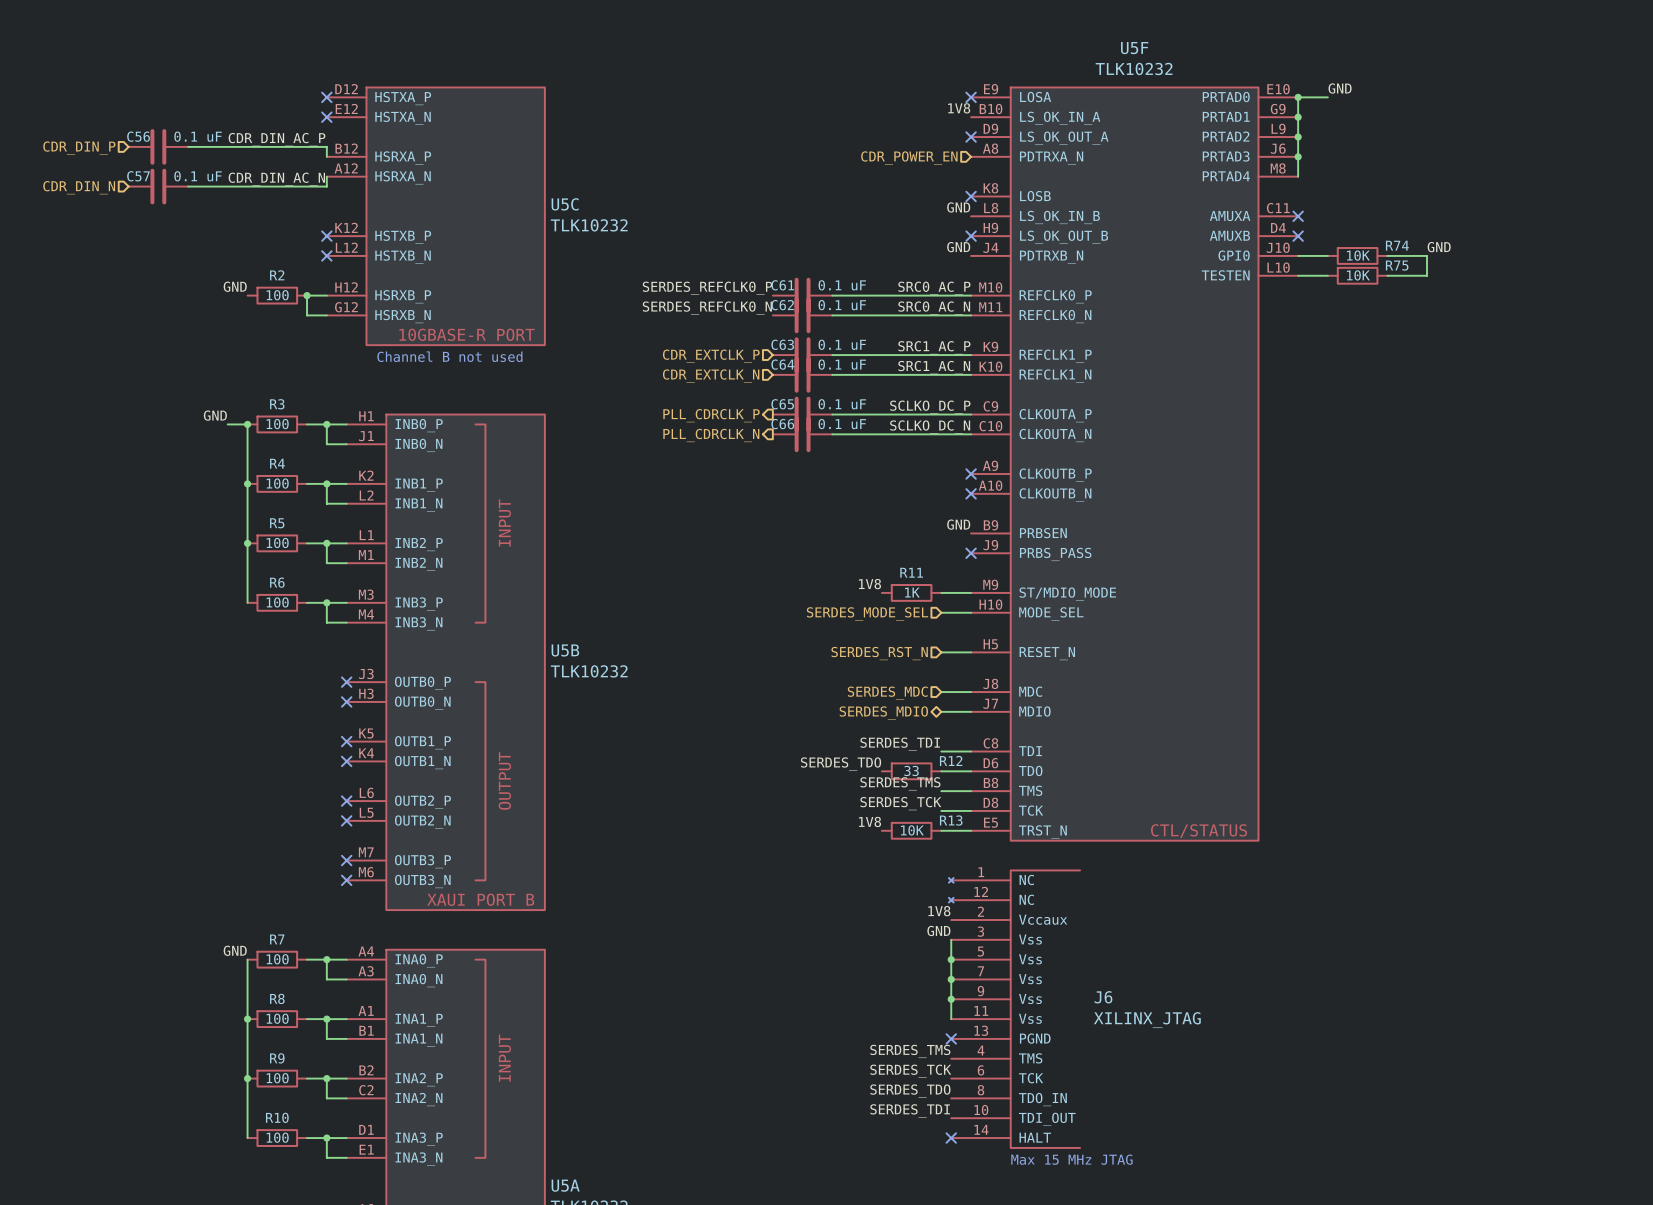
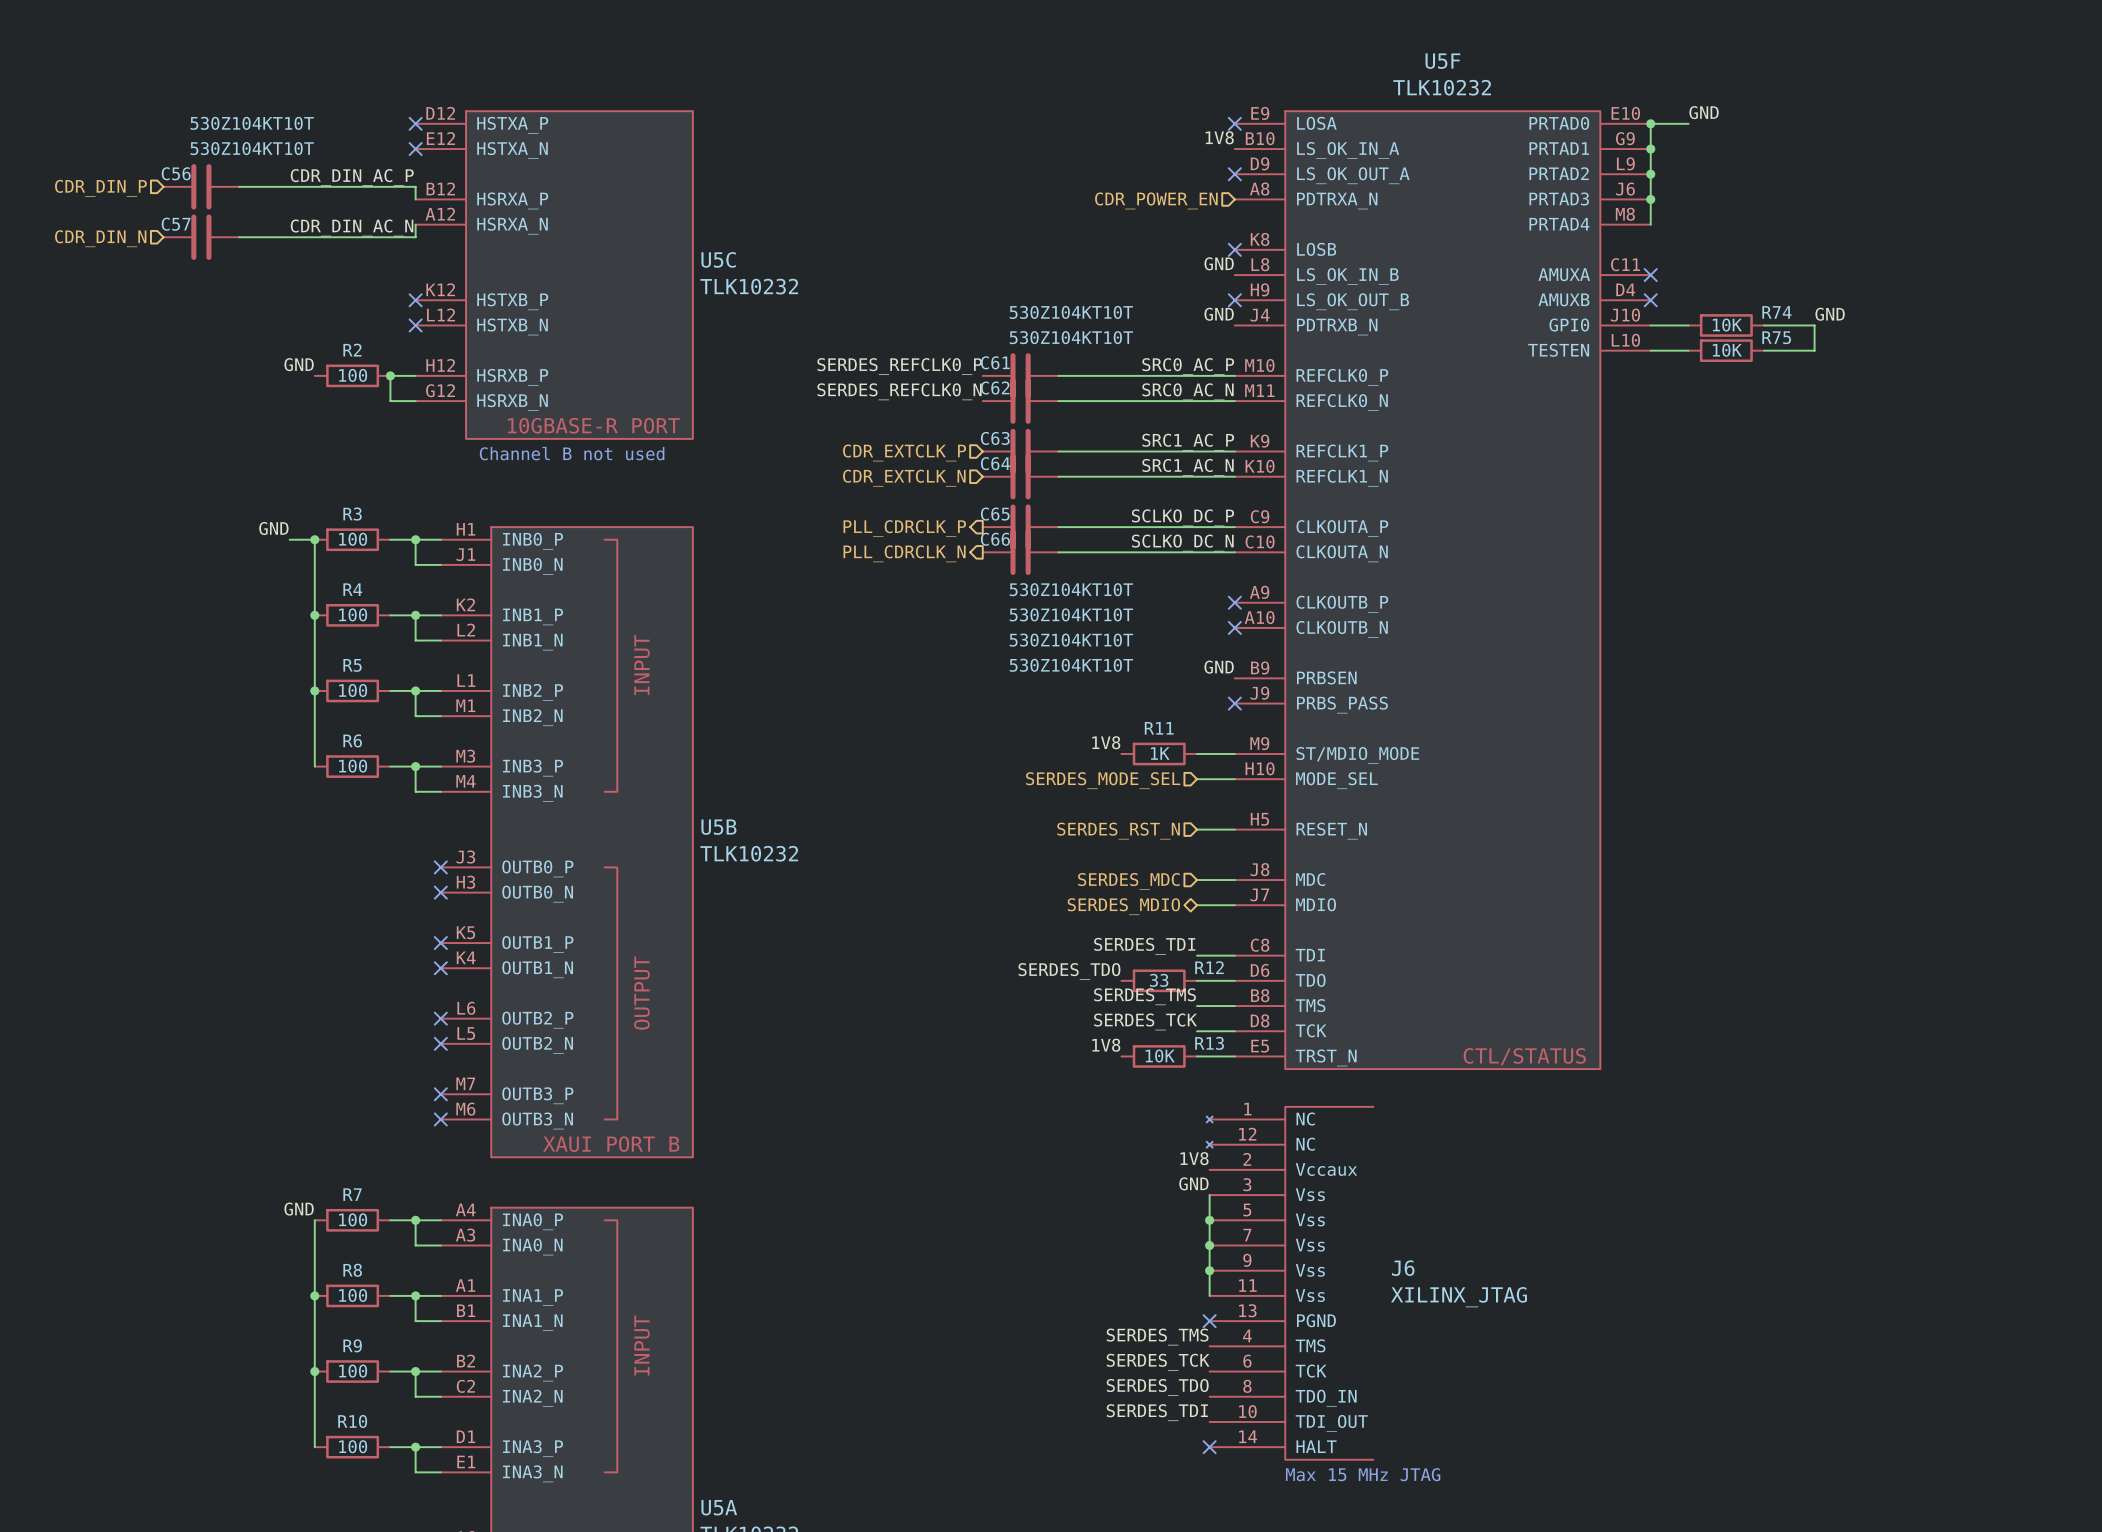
C56 value: 0.1 uF (198, 136) -> 530Z104KT10T (252, 123)
C57 value: 0.1 uF (198, 176) -> 530Z104KT10T (252, 148)
C61 value: 0.1 uF (842, 285) -> 530Z104KT10T (1071, 312)
C62 value: 0.1 uF (842, 305) -> 530Z104KT10T (1071, 337)
C63 value: 0.1 uF (842, 344) -> 530Z104KT10T (1071, 589)
C64 value: 0.1 uF (842, 364) -> 530Z104KT10T (1071, 614)
C65 value: 0.1 uF (842, 404) -> 530Z104KT10T (1071, 640)
C66 value: 0.1 uF (842, 424) -> 530Z104KT10T (1071, 665)

